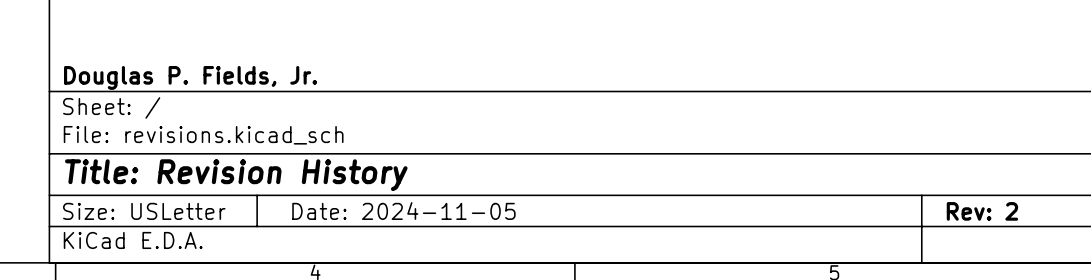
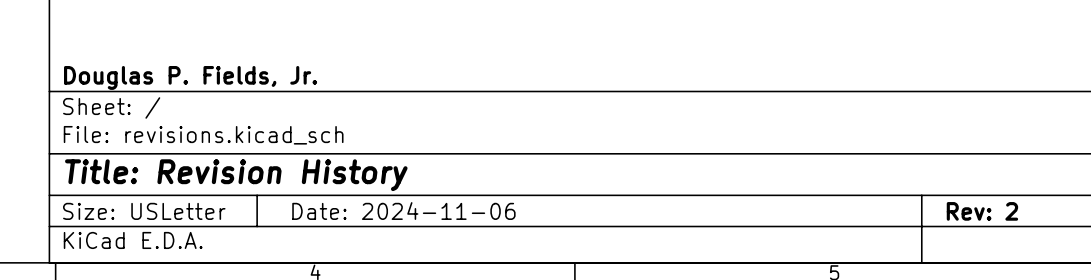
title block: Date: 2024-11-05 (403, 211) -> Date: 2024-11-06 (403, 211)

